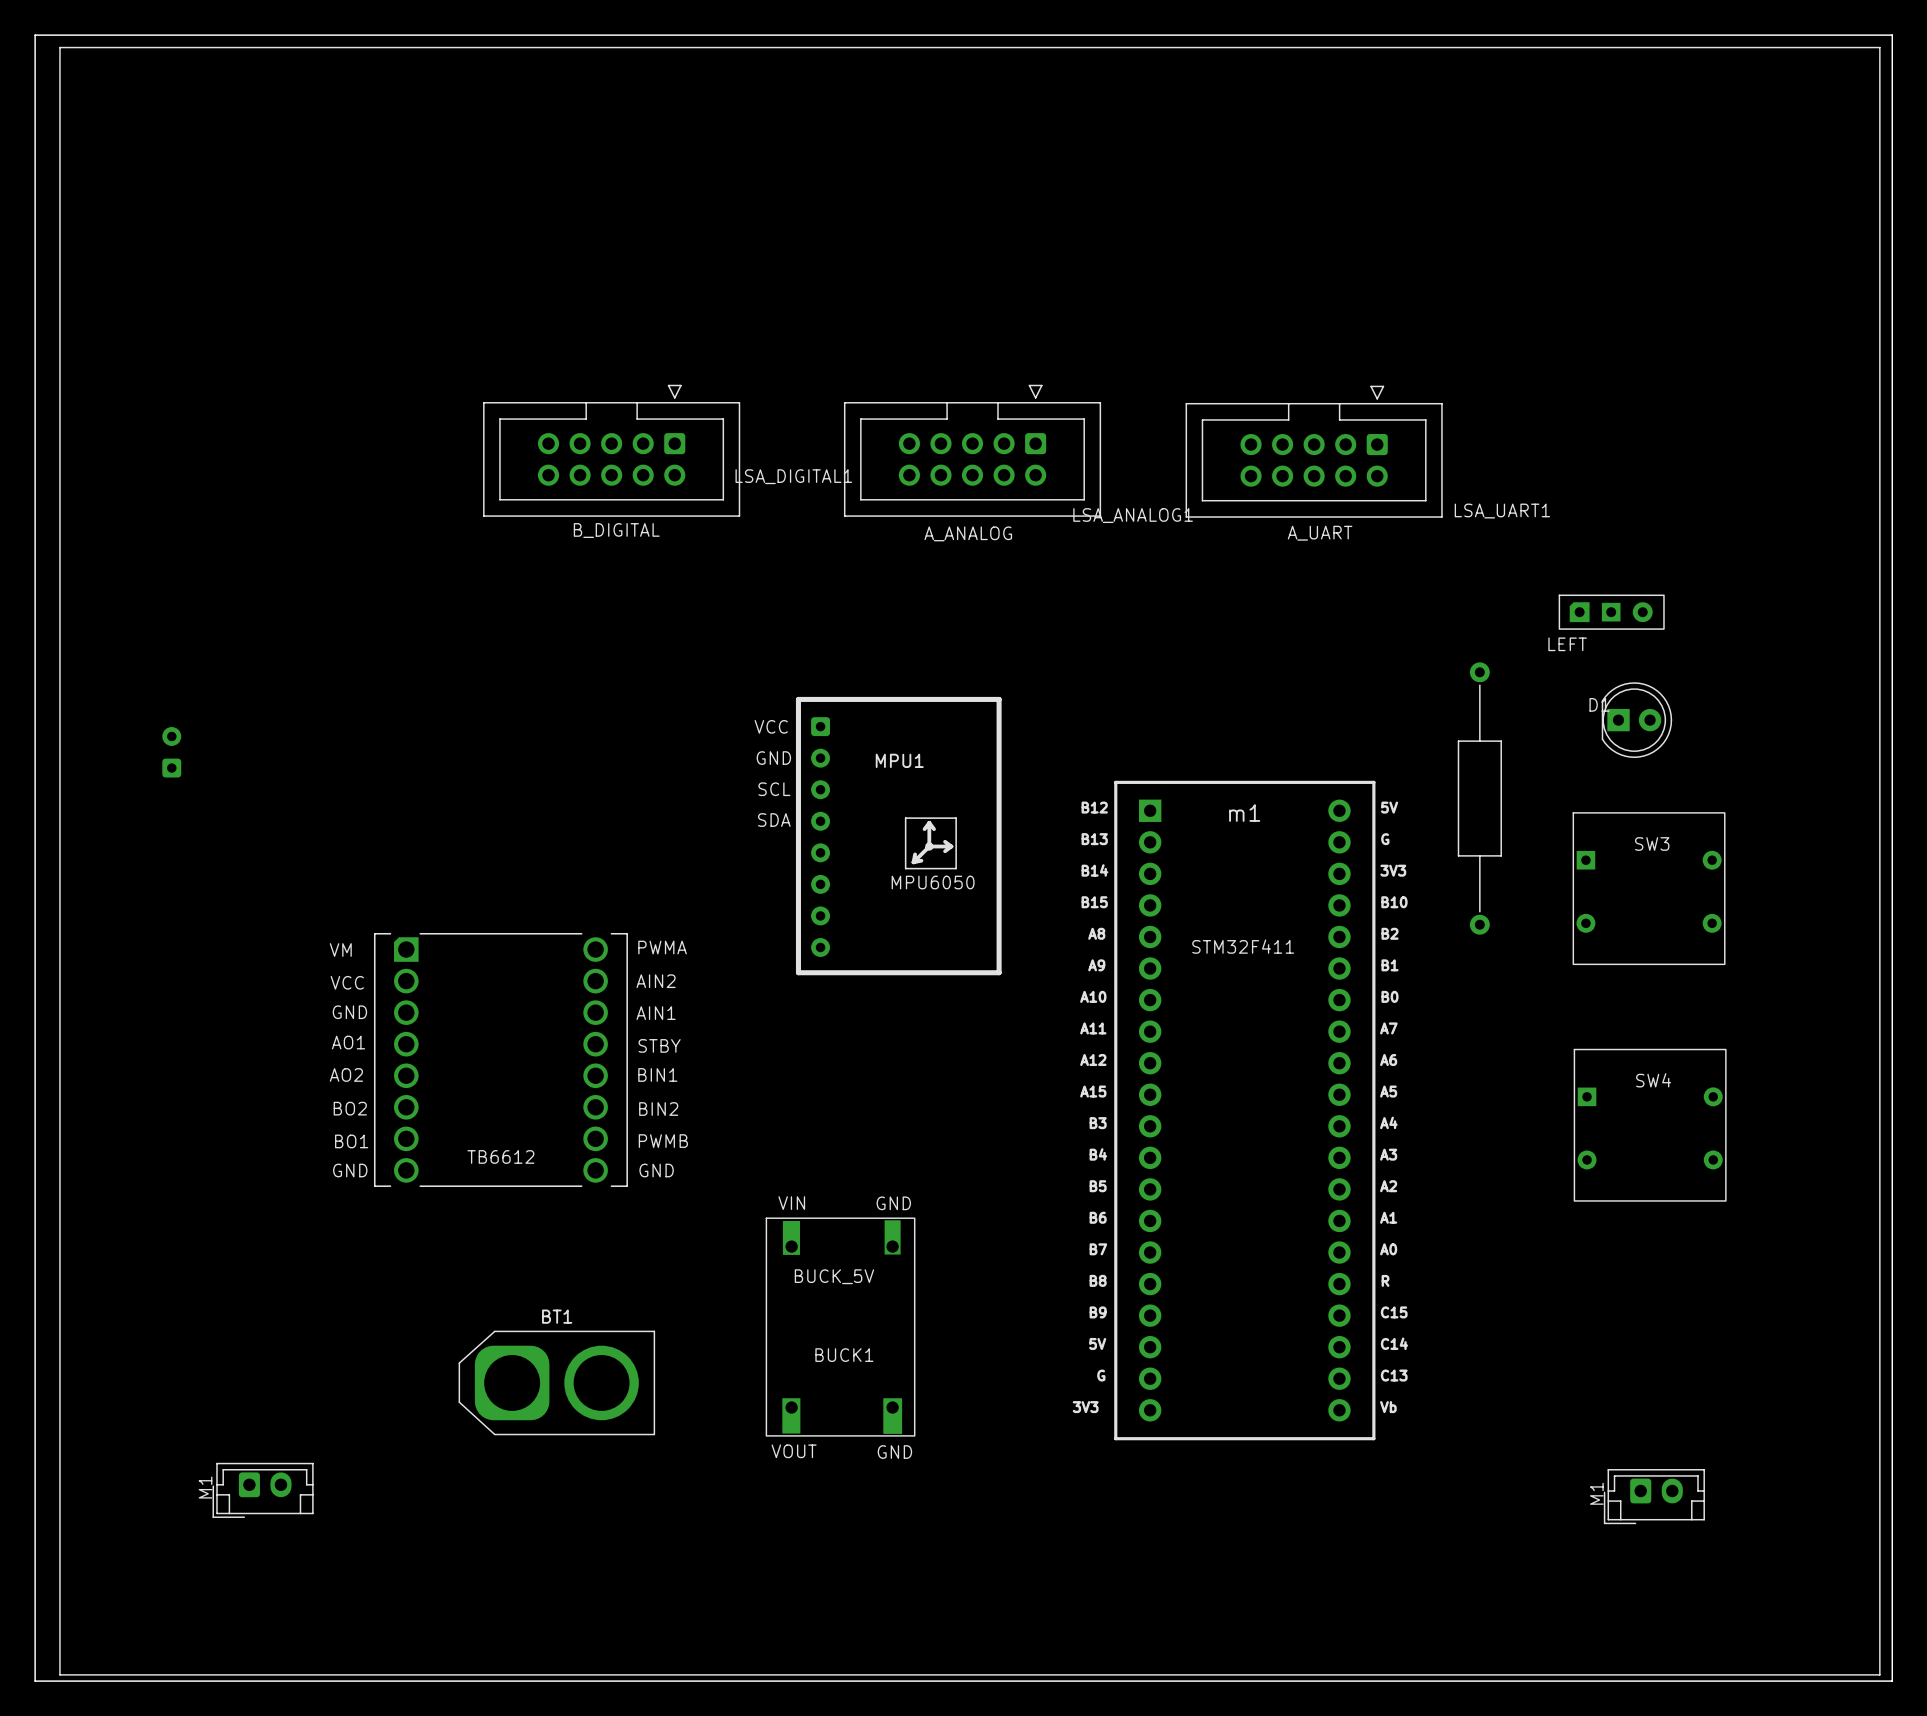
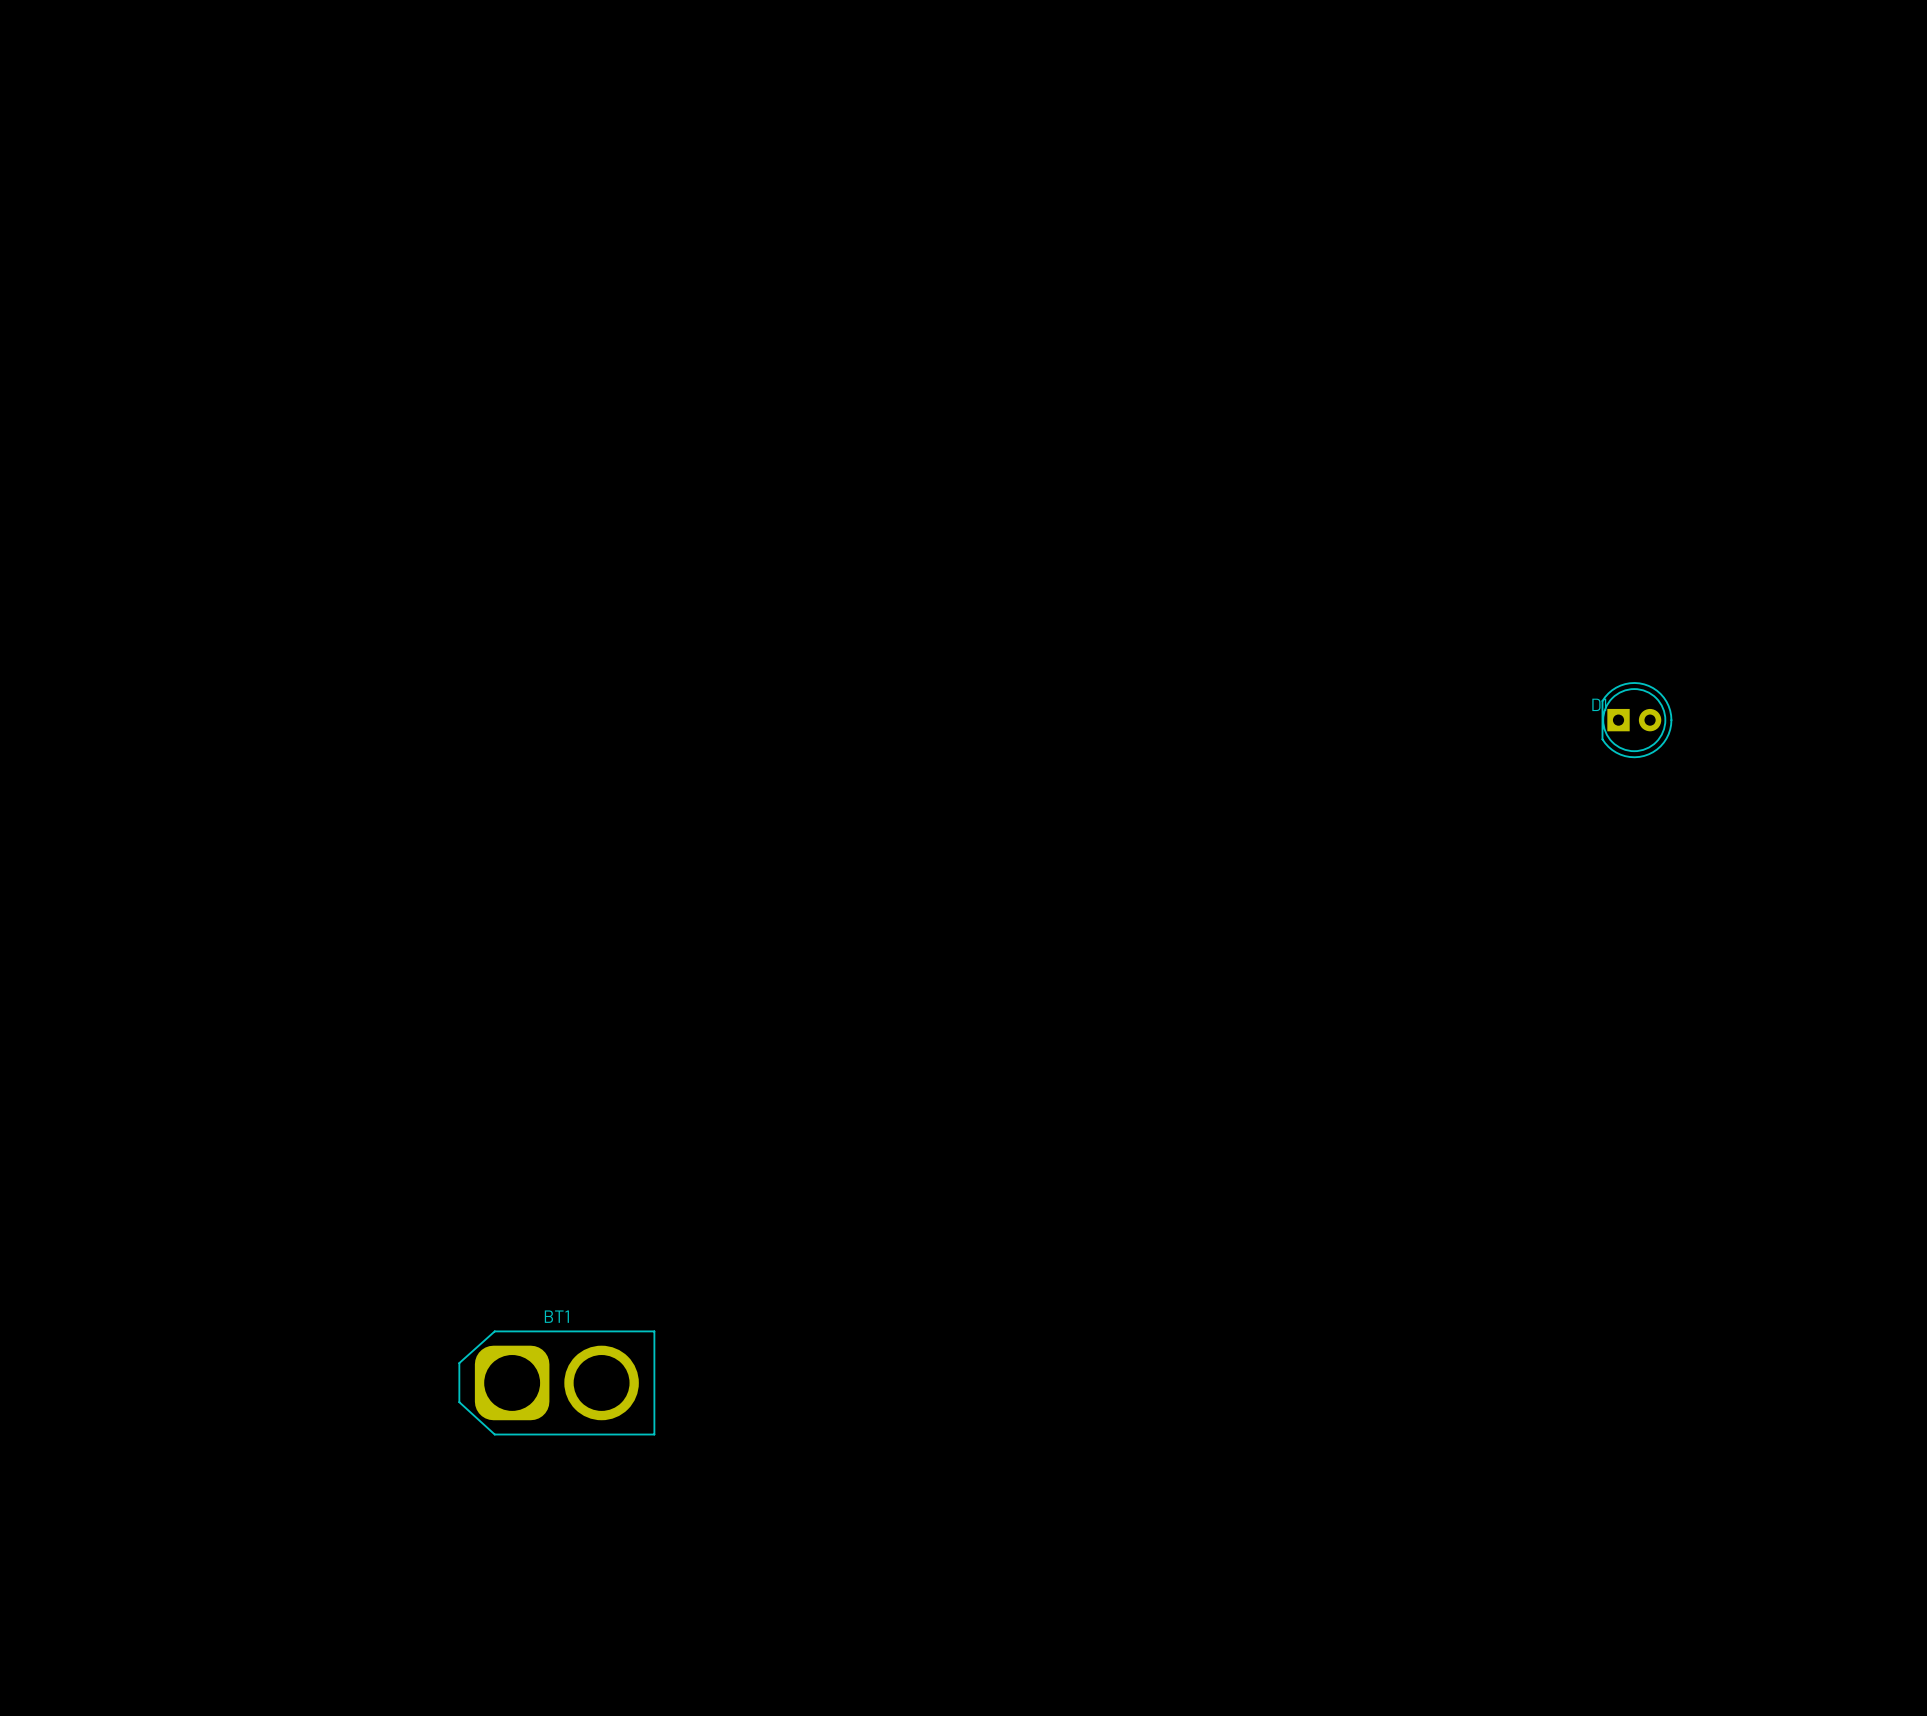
board edge: (35, 35) (1892, 35) (1892, 1681) (35, 1681) (35, 35) -> none
line: (59, 47) (1879, 47) (1879, 1674) (59, 1674) (59, 47) -> none
LSA_DIGITAL1: (611, 450) -> none
LSA_ANALOG1: (972, 450) -> none
LSA_UART1: (1314, 451) -> none
part: (1611, 612) -> none
part: (171, 752) -> none
part: (1479, 798) -> none
MPU1: (898, 836) -> none
SW3: (1649, 888) -> none
part: (500, 1059) -> none
m1: (1244, 1110) -> none
SW4: (1650, 1125) -> none
BUCK1: (840, 1327) -> none
part: (263, 1490) -> none
part: (1654, 1496) -> none

